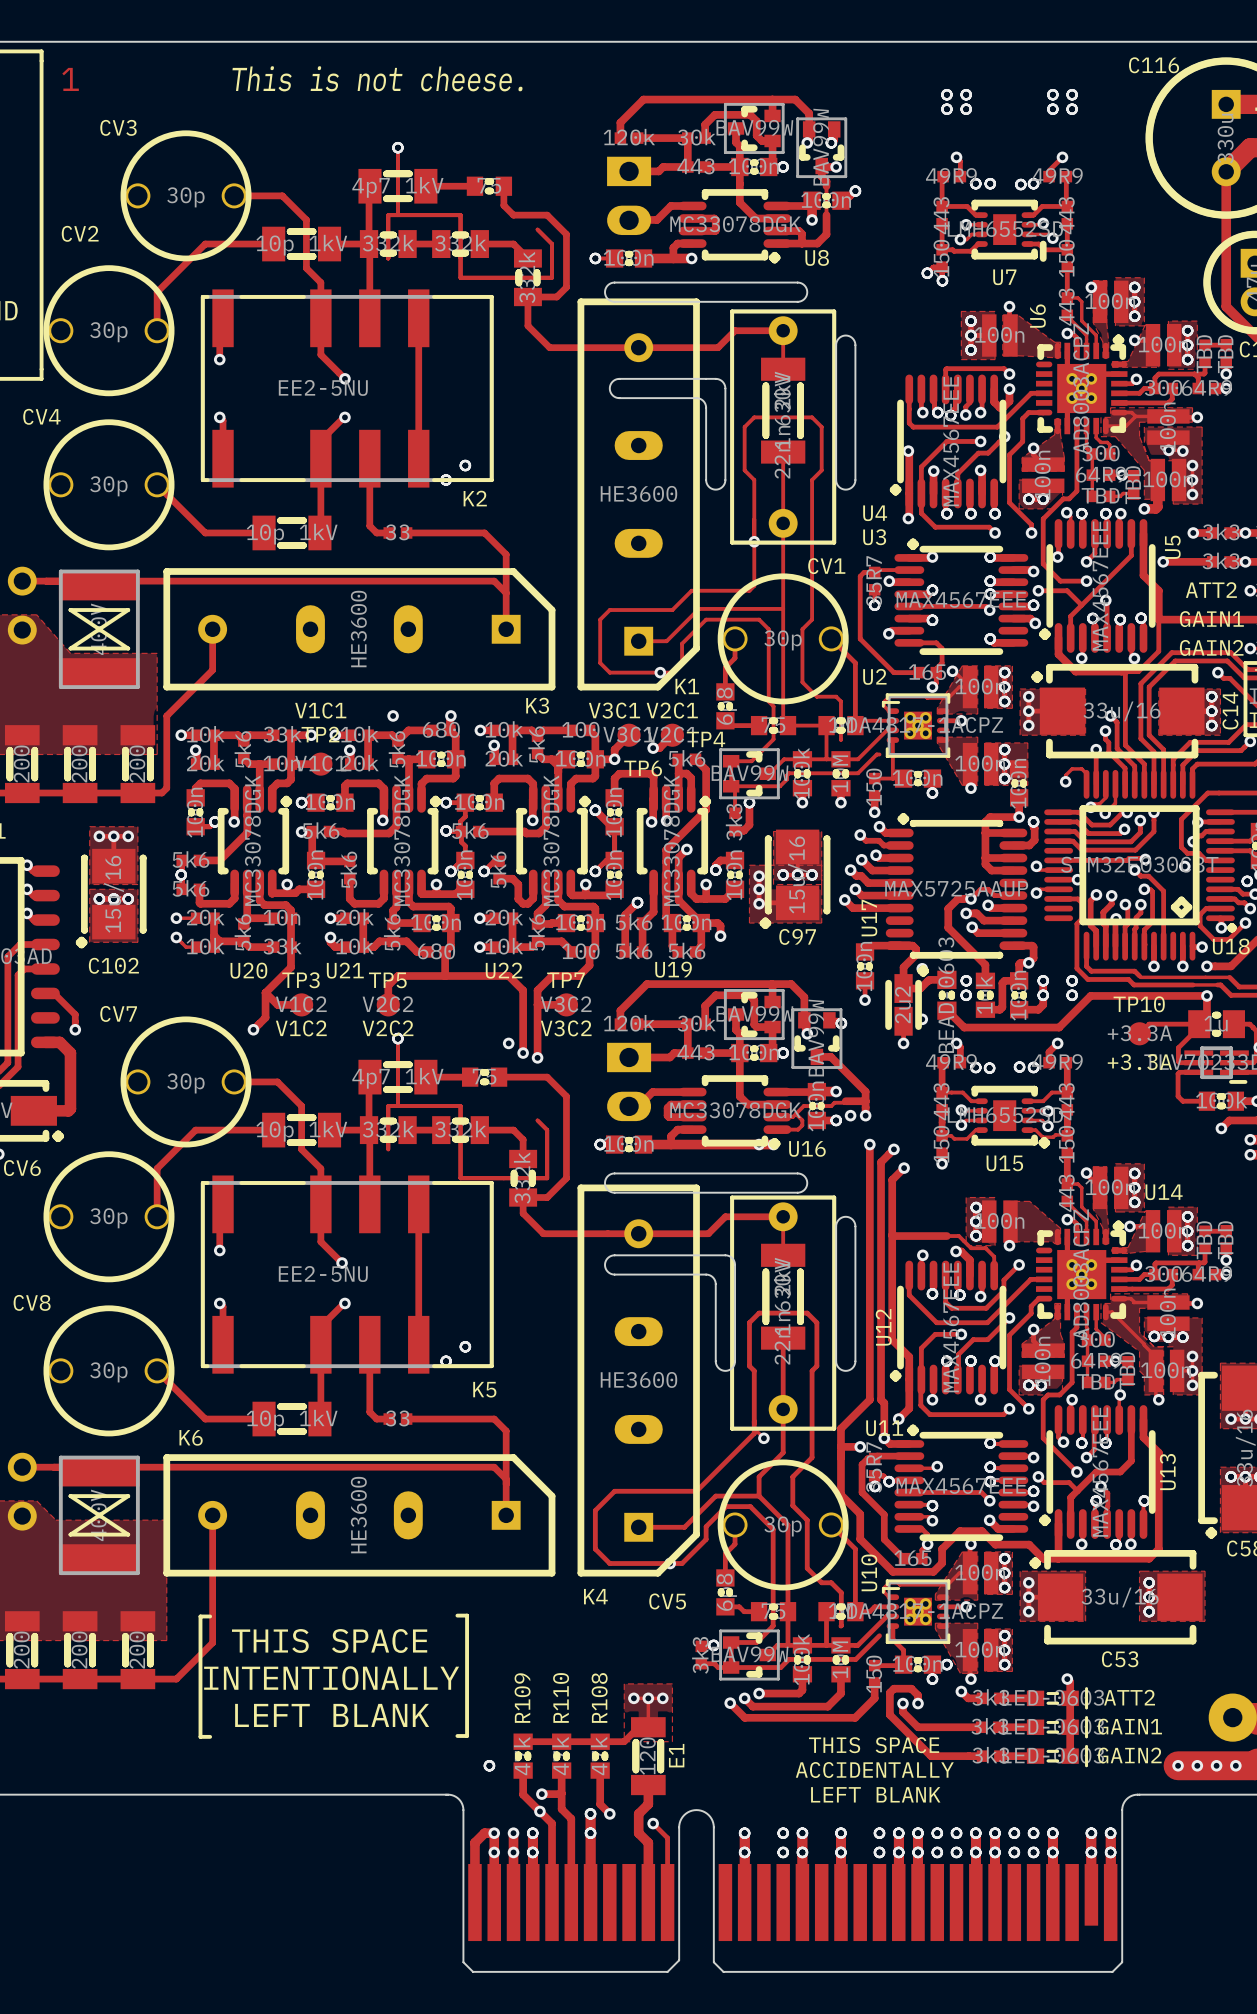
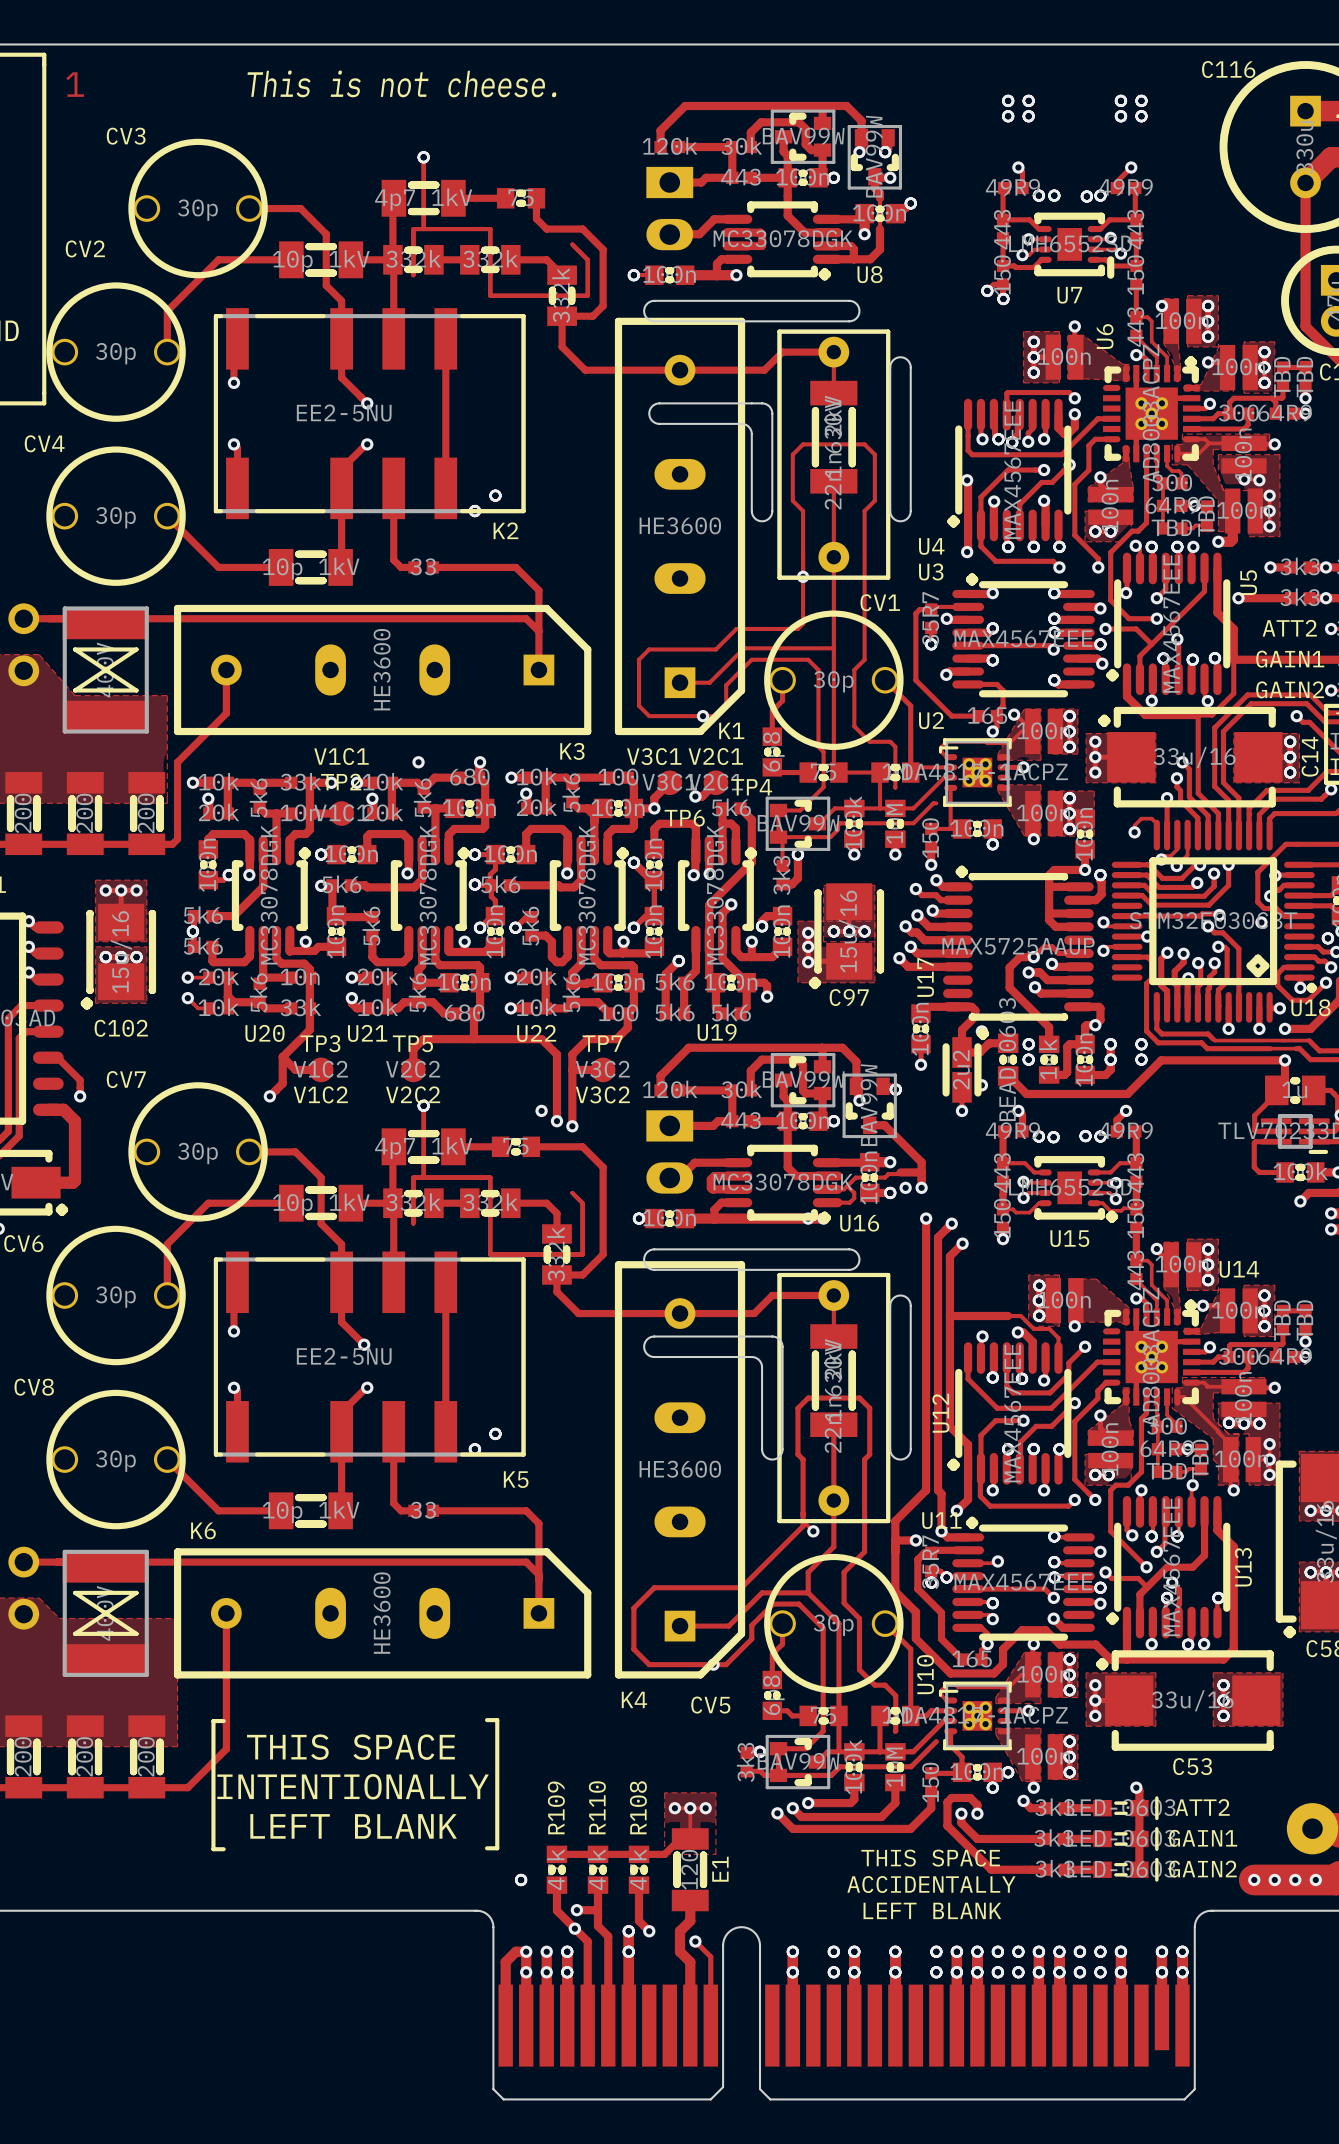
track: (1199, 1024) (1149, 1024) (1139, 1033) -> none
TP10: +3.3A (1139, 1033) -> none
text: +3.3A (1139, 1062) -> none

